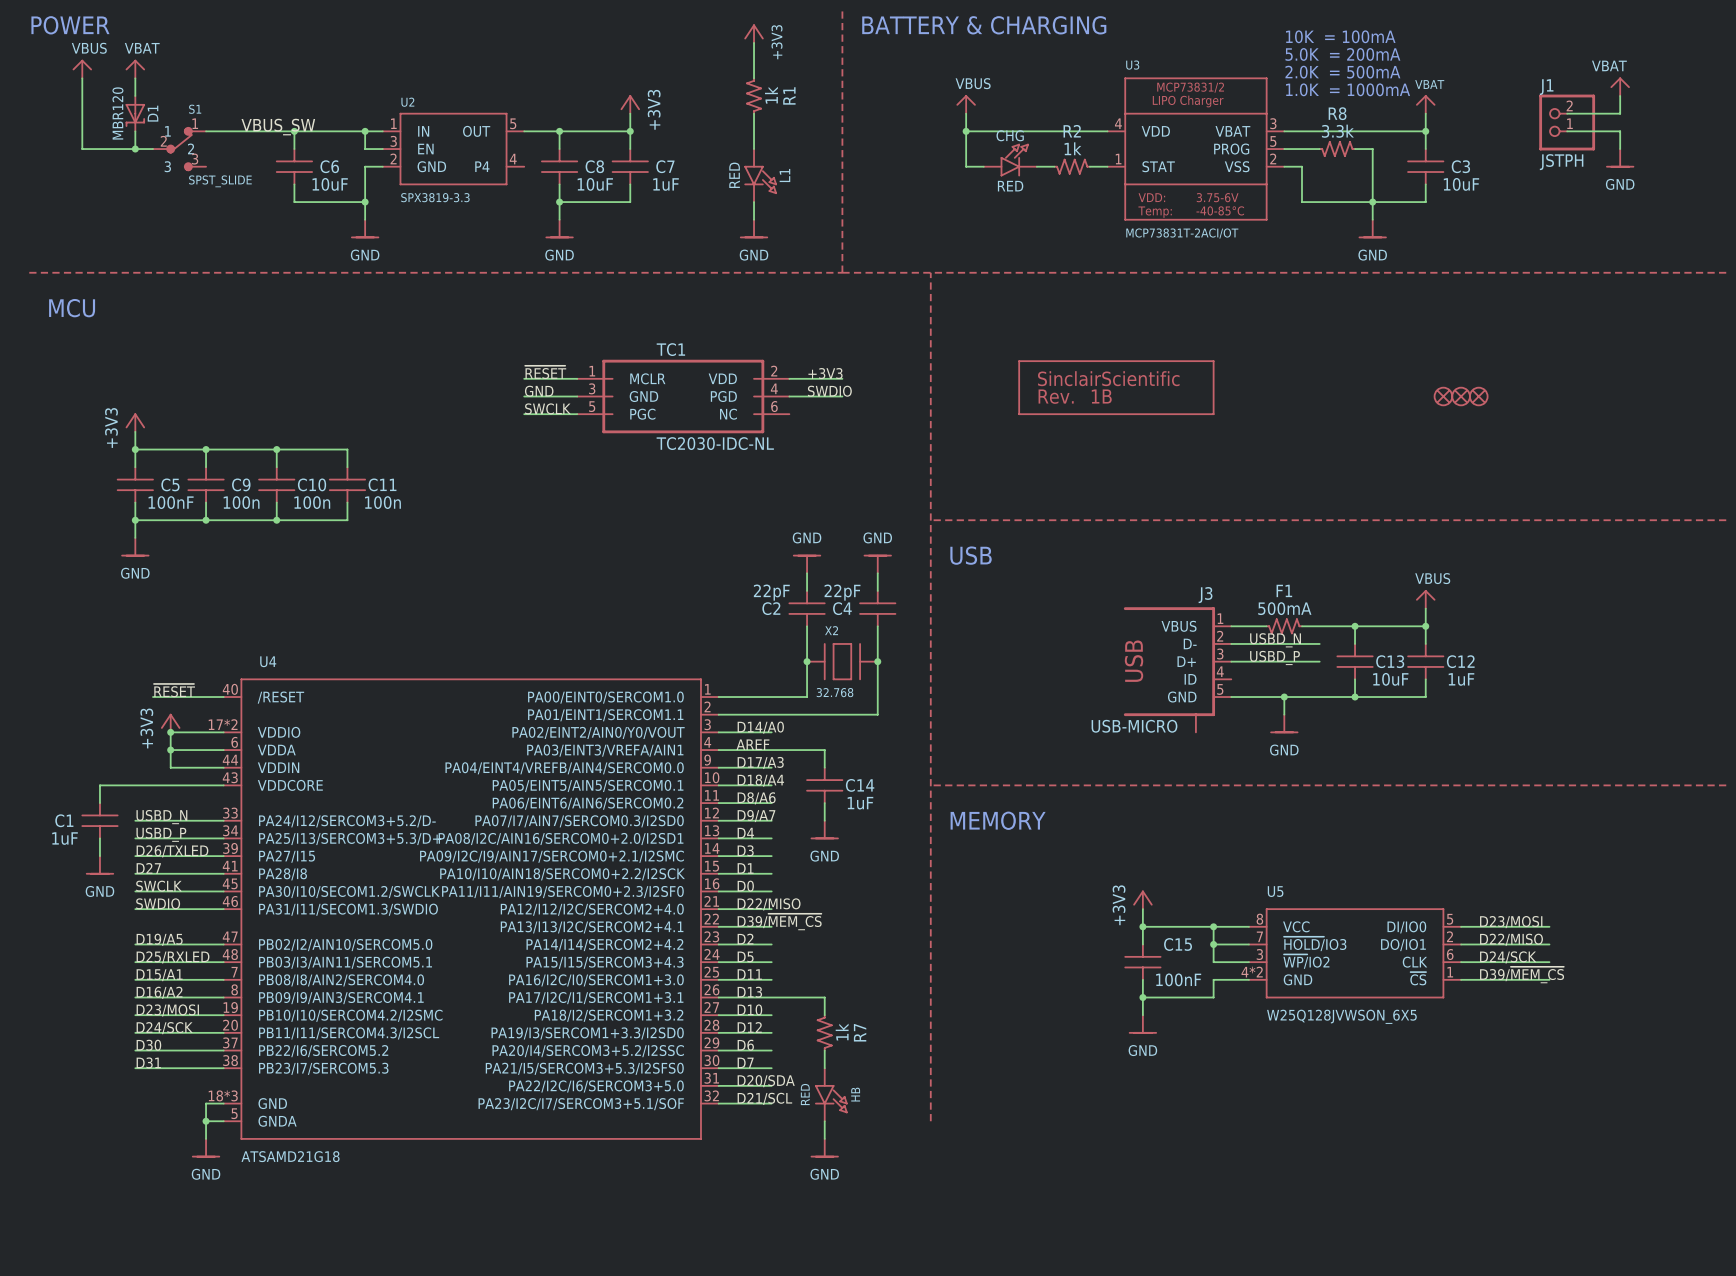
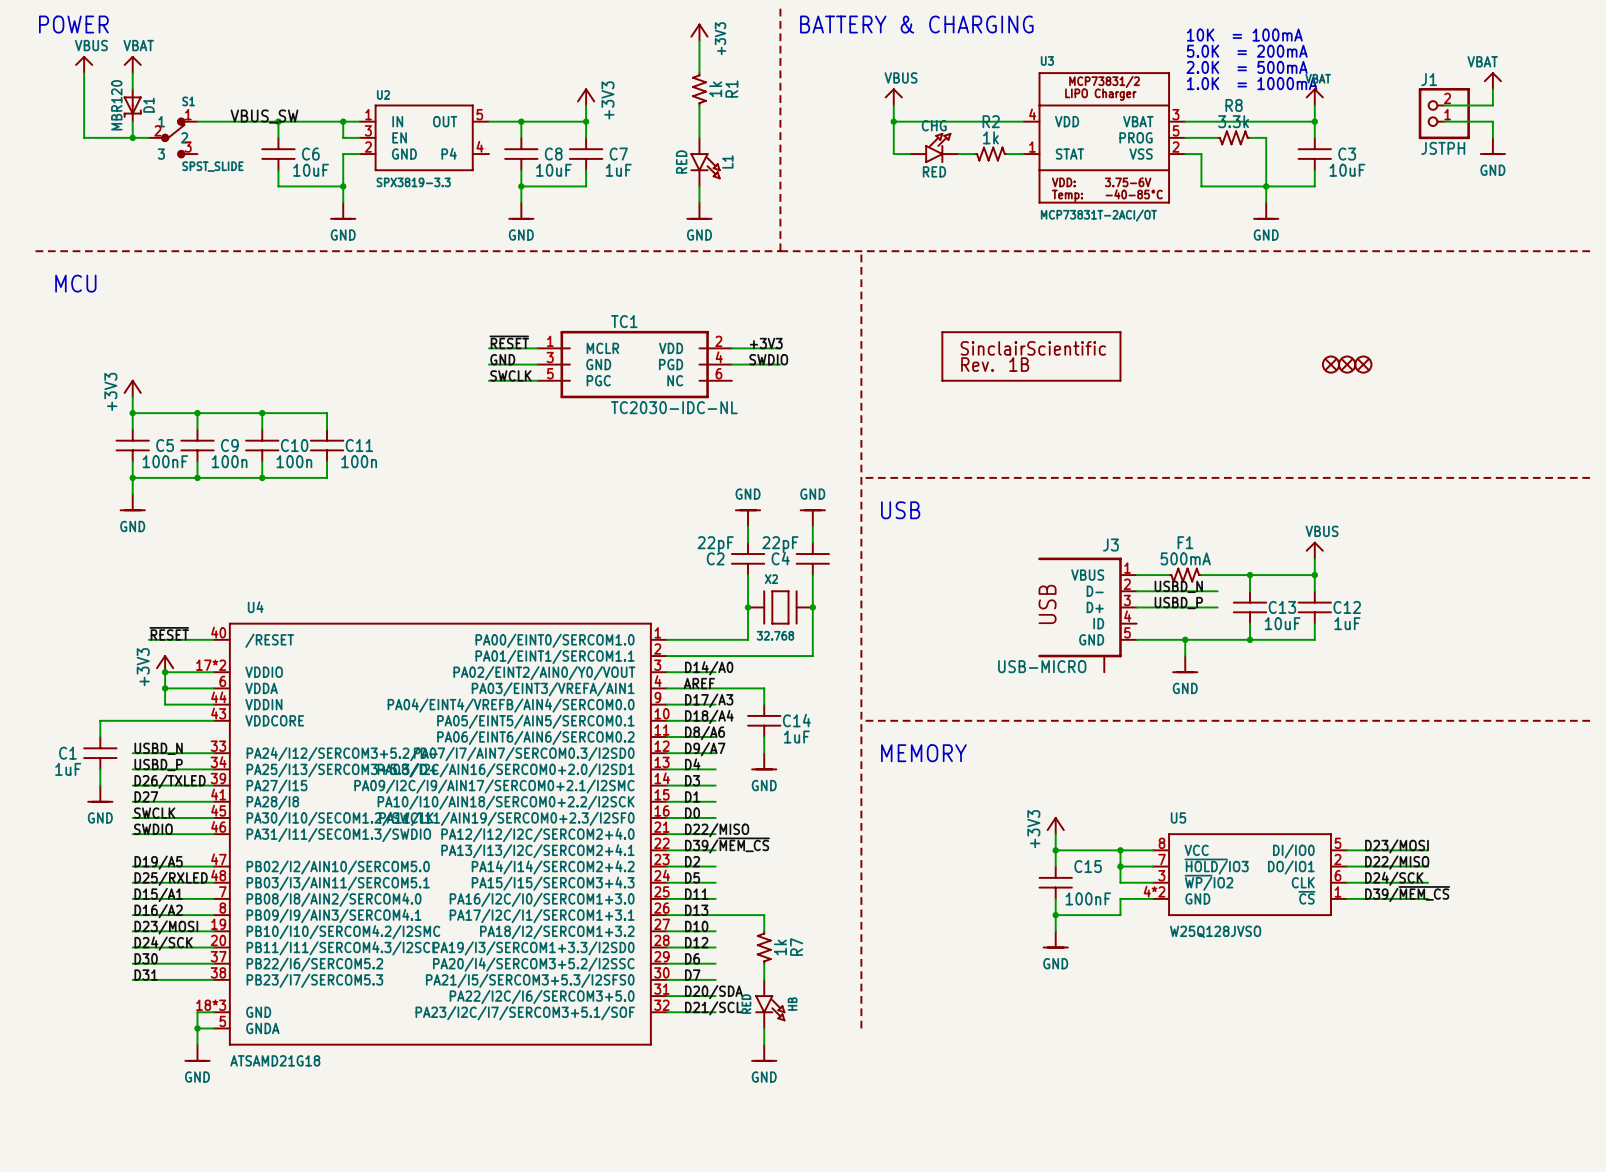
U5 value: W25Q128JVWSON_6X5 (1341, 1016) -> W25Q128JVSO (1215, 931)

